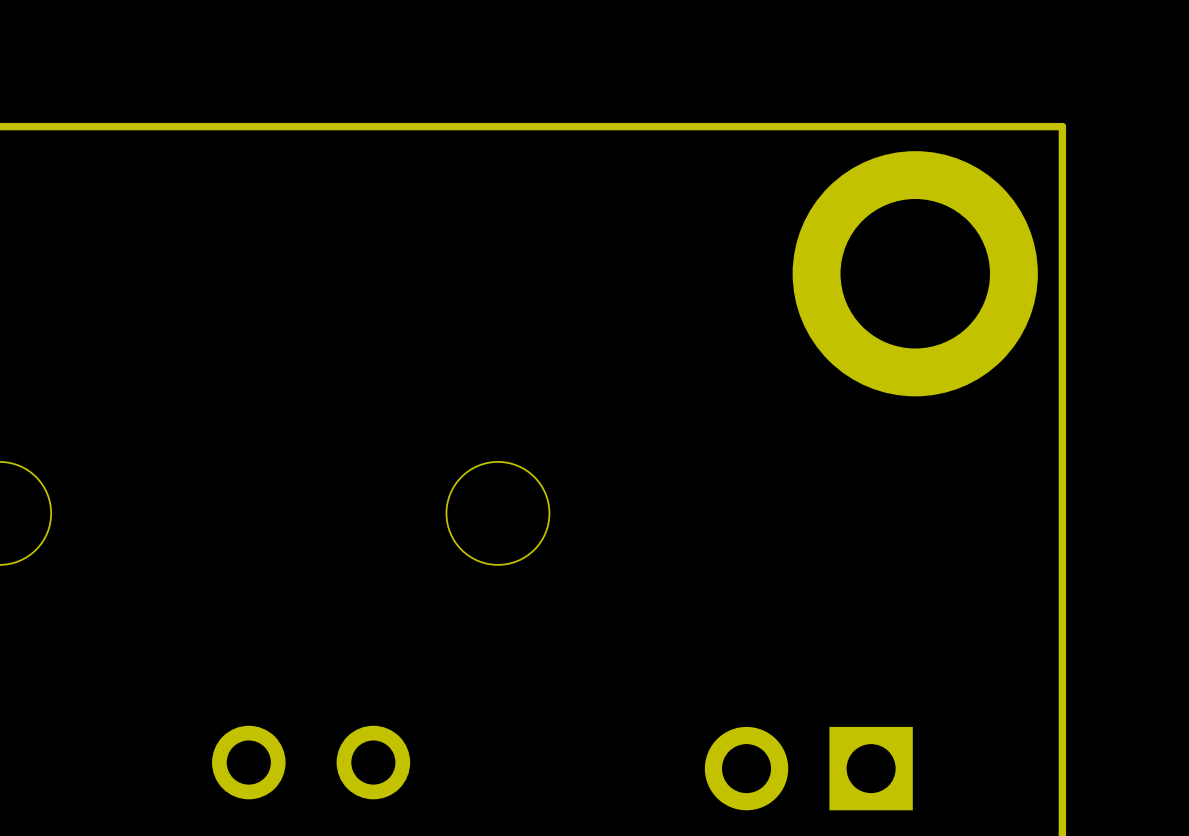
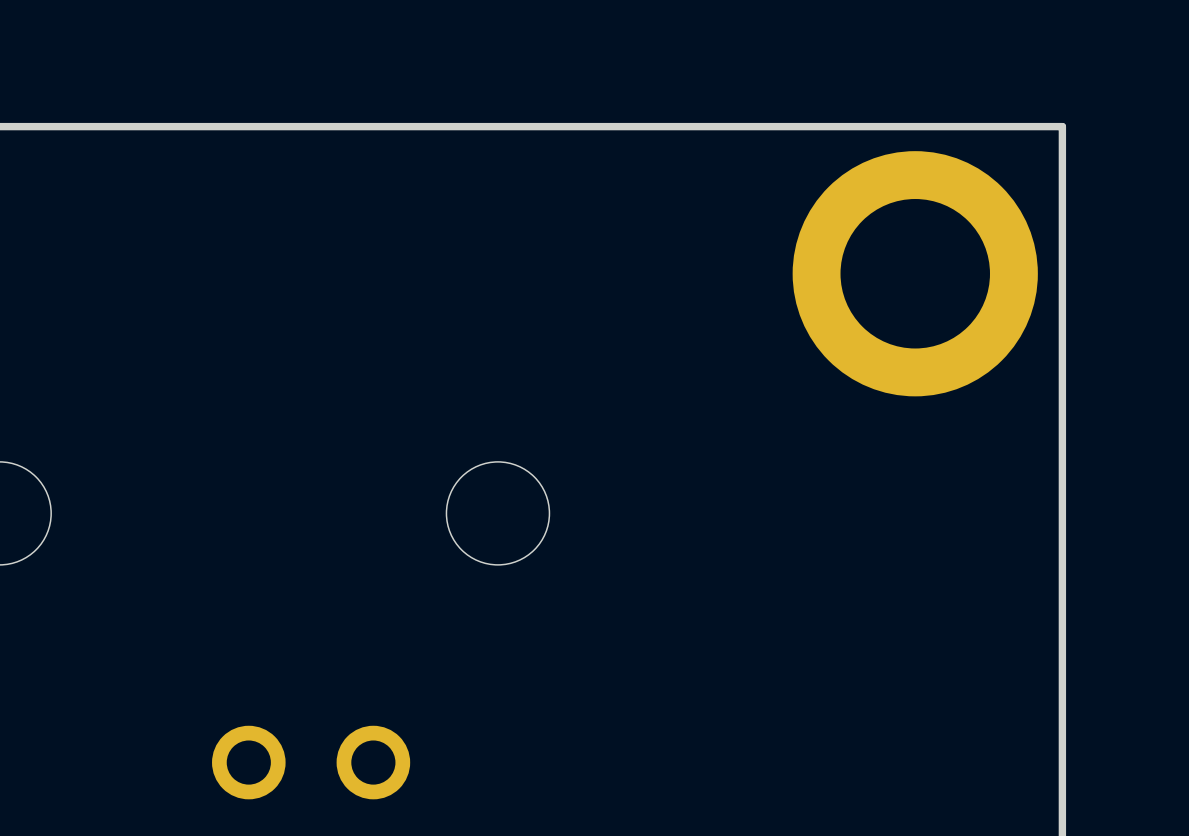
part: (808, 768) -> none

